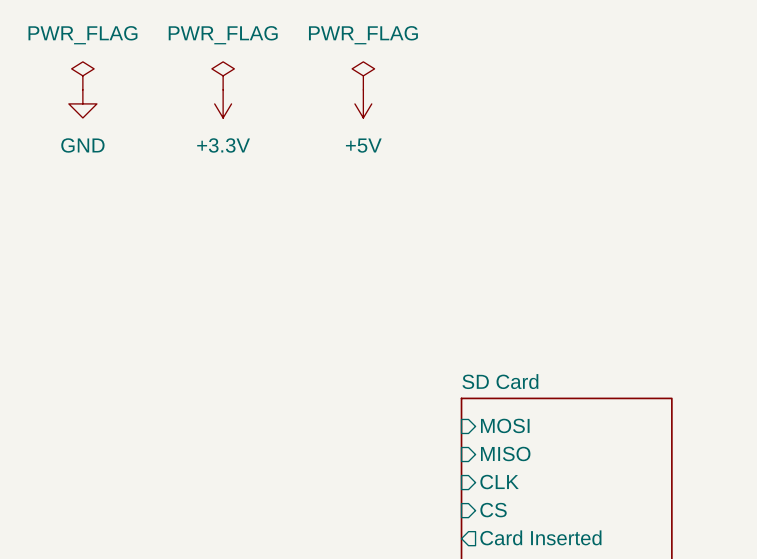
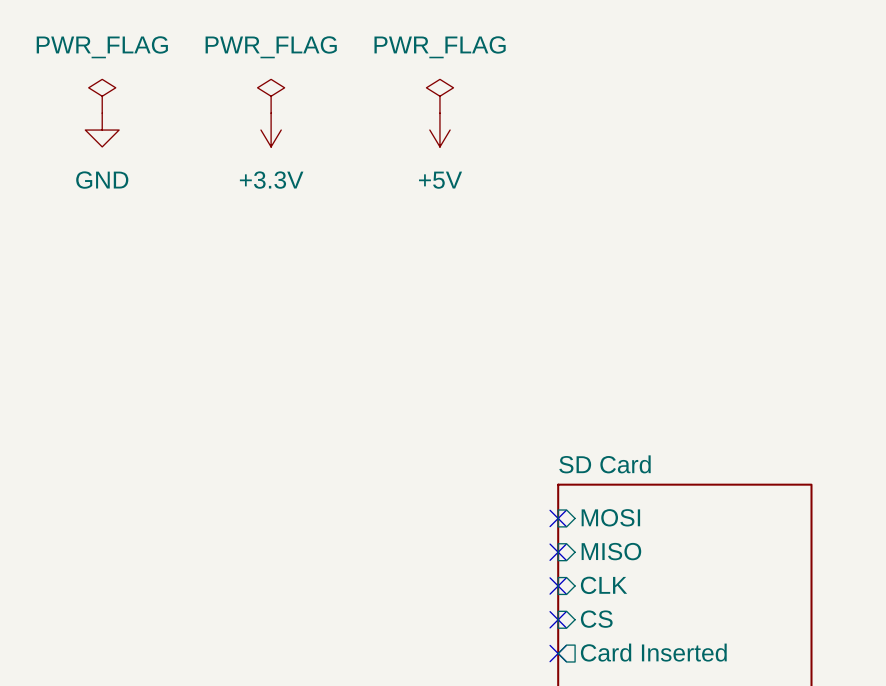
no-connect mark: none -> (558, 518)
no-connect mark: none -> (558, 552)
no-connect mark: none -> (558, 585)
no-connect mark: none -> (558, 619)
no-connect mark: none -> (558, 653)

